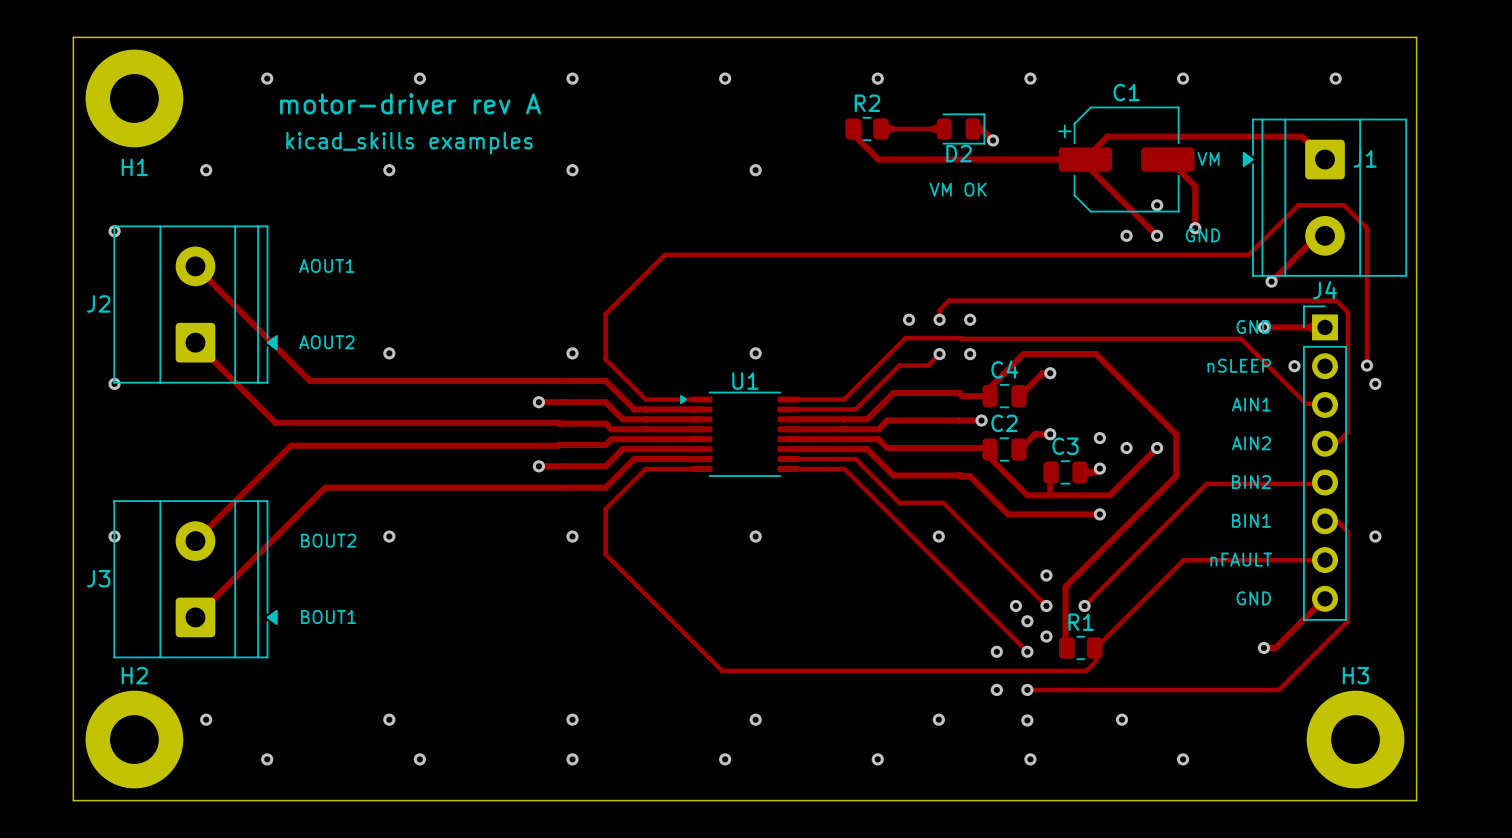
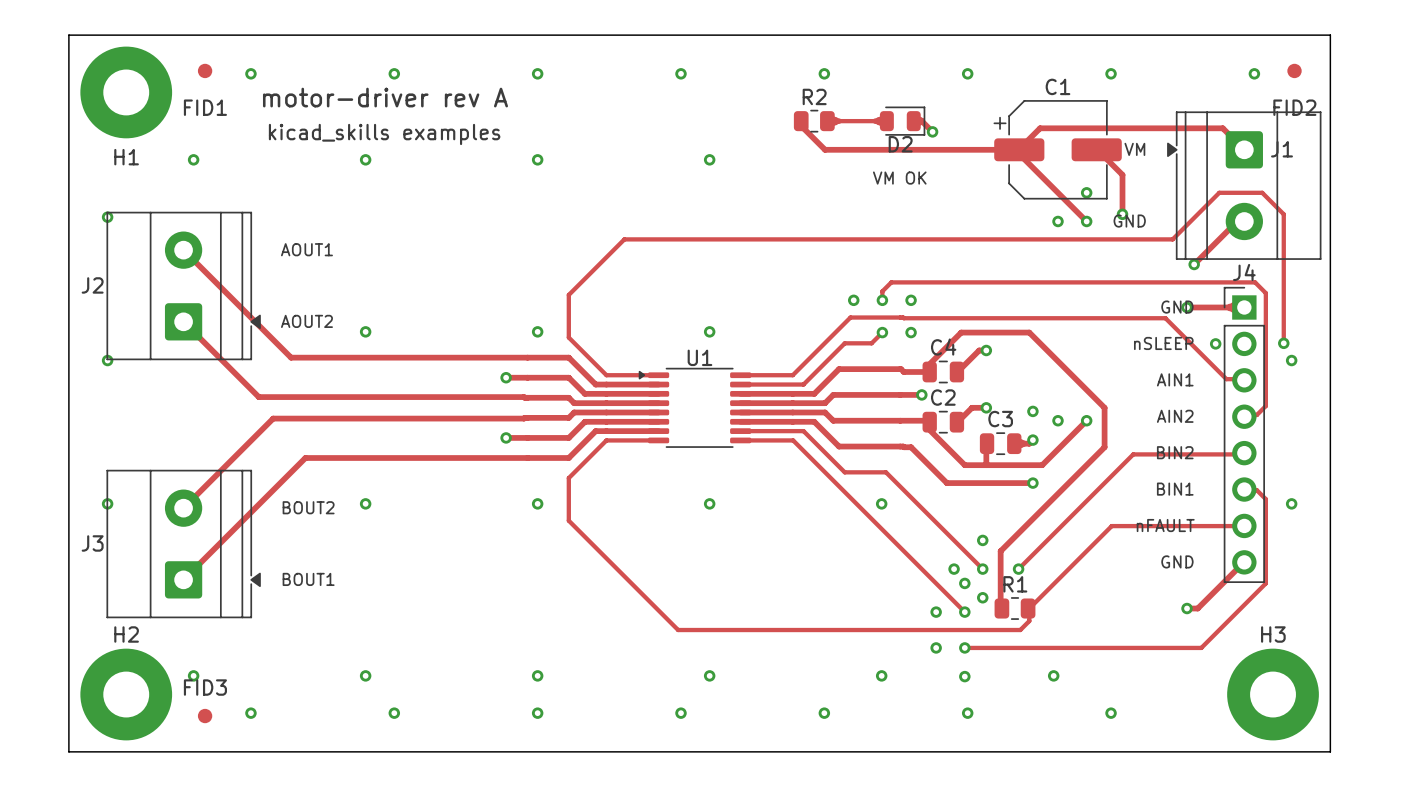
FID1: none -> (205, 70)
FID2: none -> (1294, 70)
FID3: none -> (205, 716)

